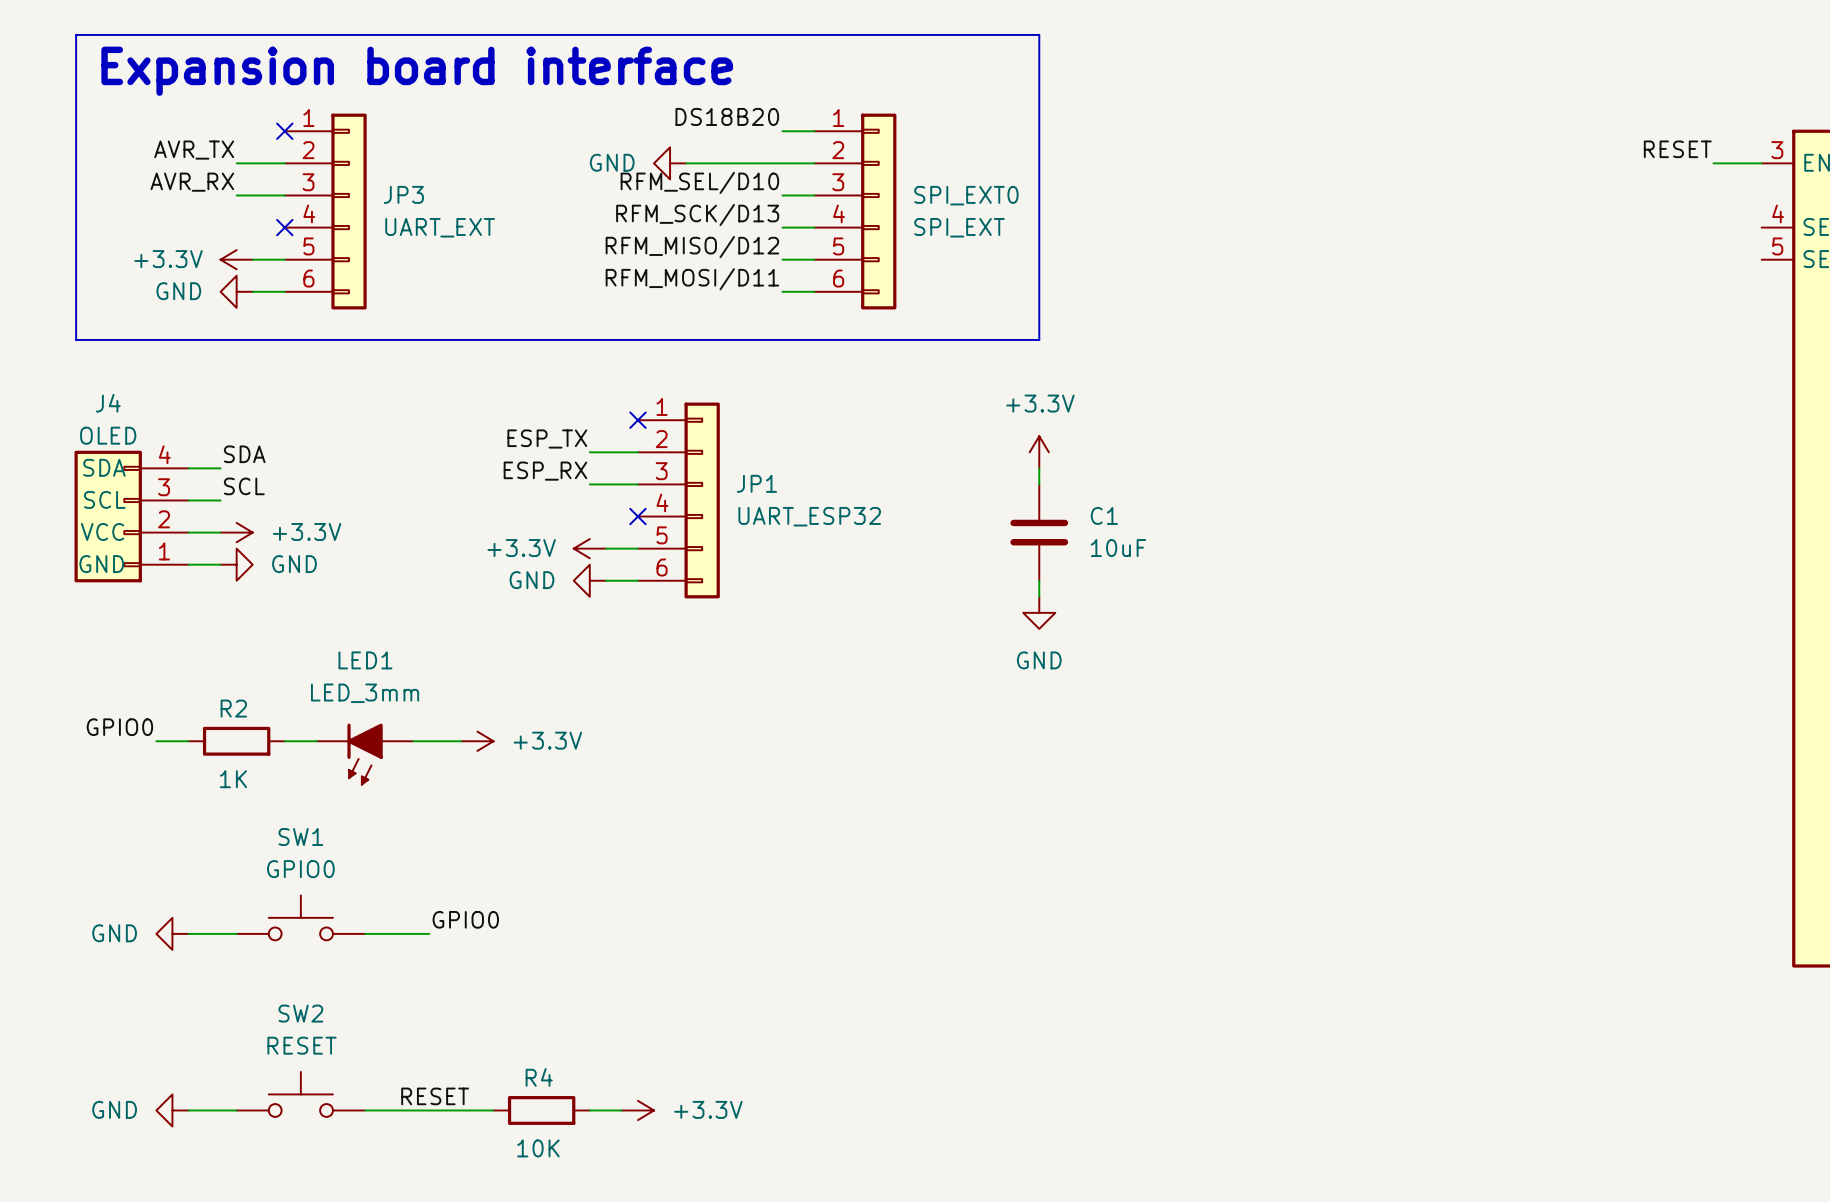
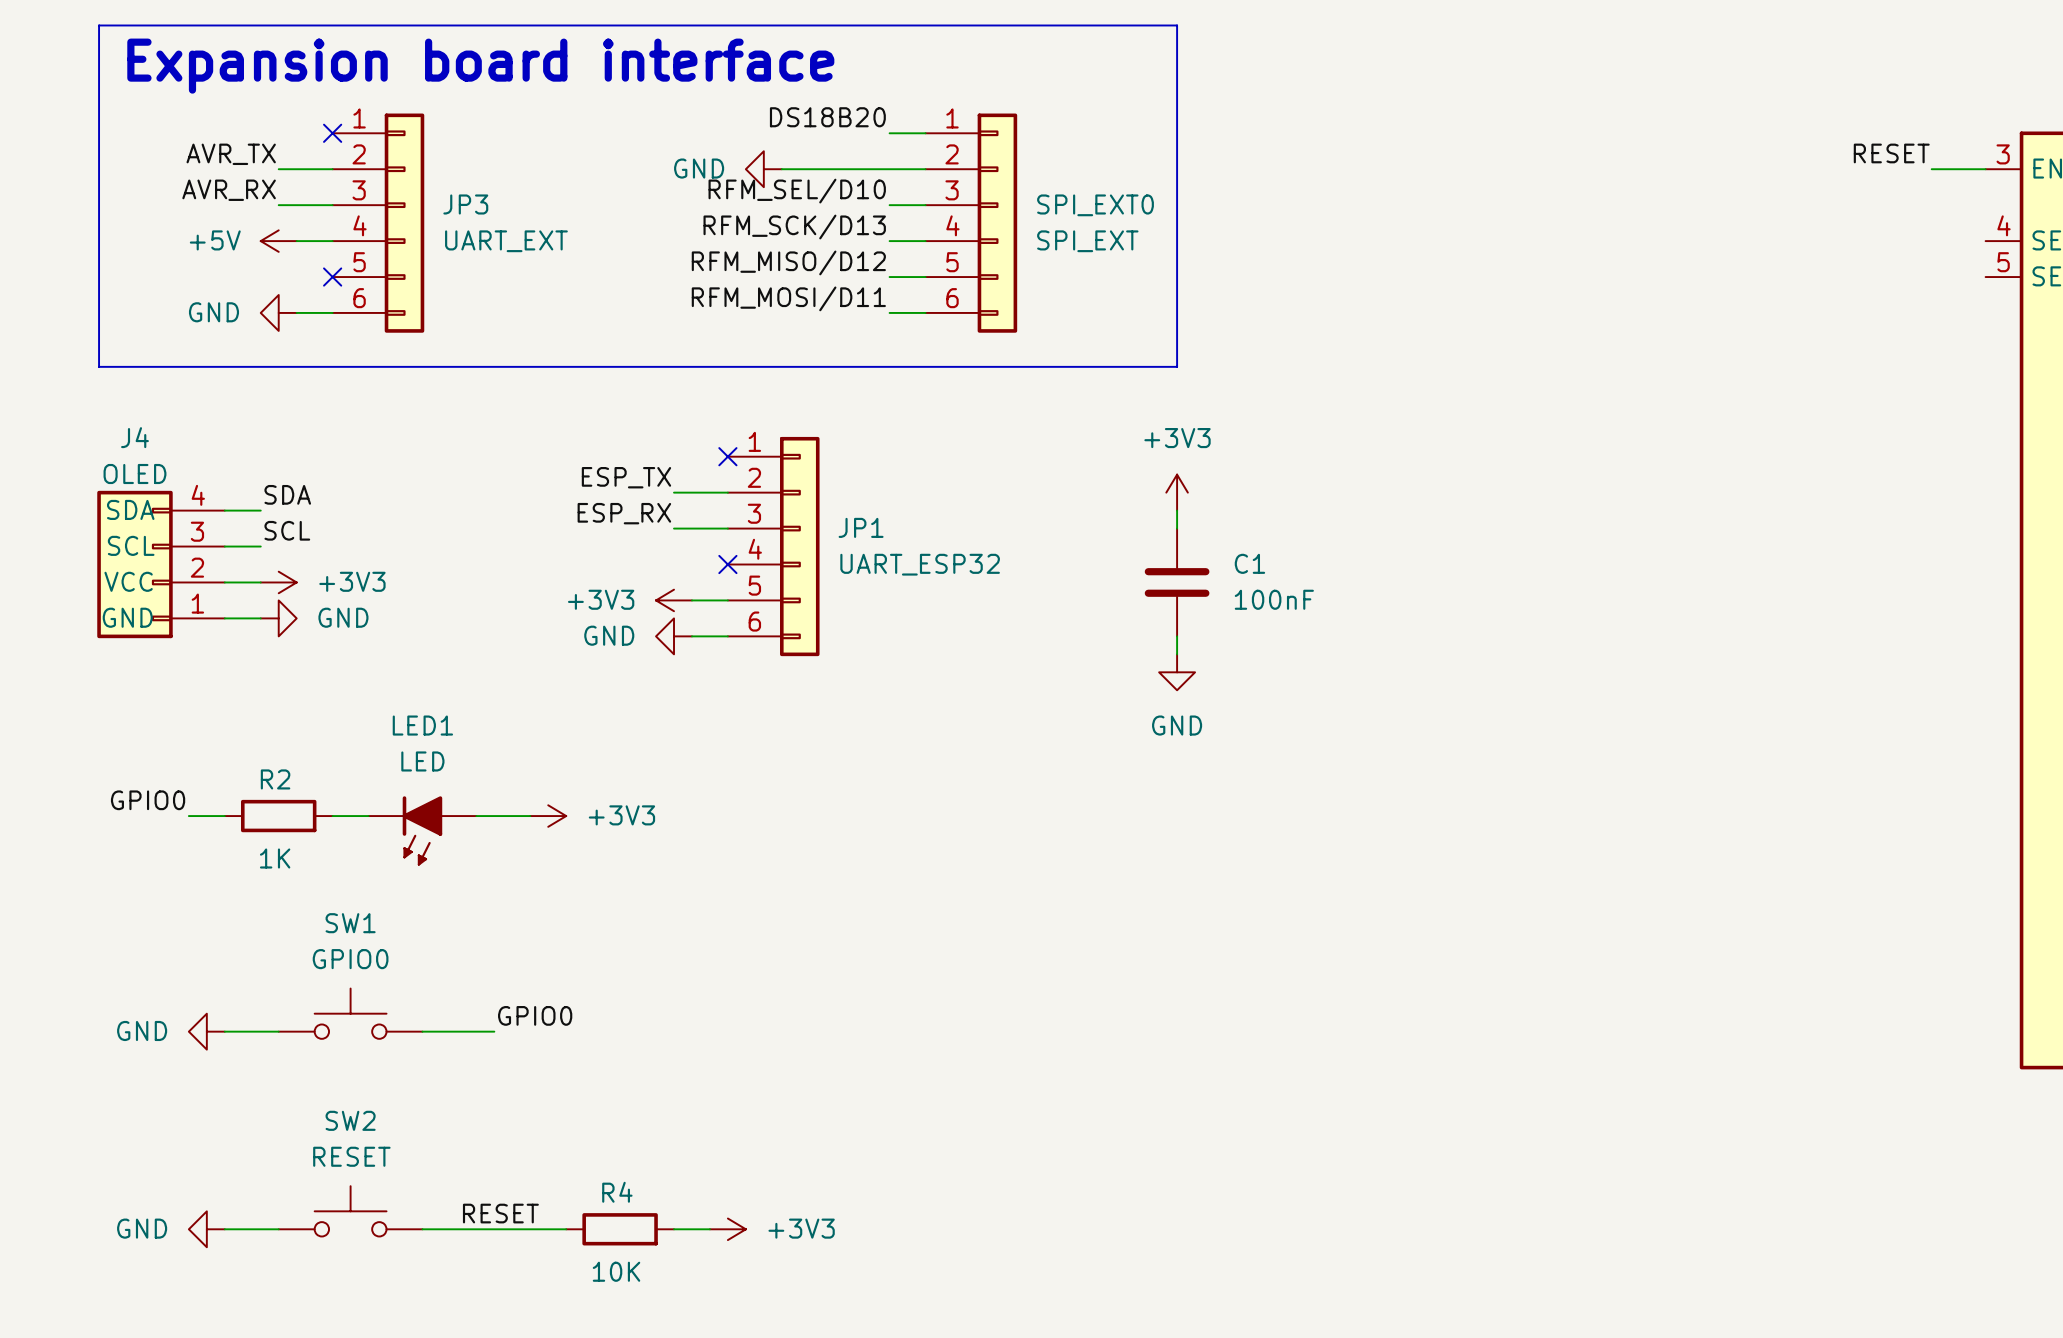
power symbol: none -> +5V (278, 241)
no-connect mark position: (284, 227) -> (332, 277)
power symbol: +3.3V (236, 259) -> none
wire: (252, 259) (284, 259) -> (296, 241) (332, 241)
power symbol: +3.3V (1039, 452) -> +3V3 (1177, 492)
power symbol: +3.3V (236, 532) -> +3V3 (278, 582)
power symbol: +3.3V (589, 548) -> +3V3 (674, 600)
C1 value: 10uF (1118, 548) -> 100nF (1274, 599)
LED1 value: LED_3mm (365, 693) -> LED (422, 761)
power symbol: +3.3V (477, 741) -> +3V3 (548, 816)
power symbol: +3.3V (637, 1110) -> +3V3 (727, 1229)

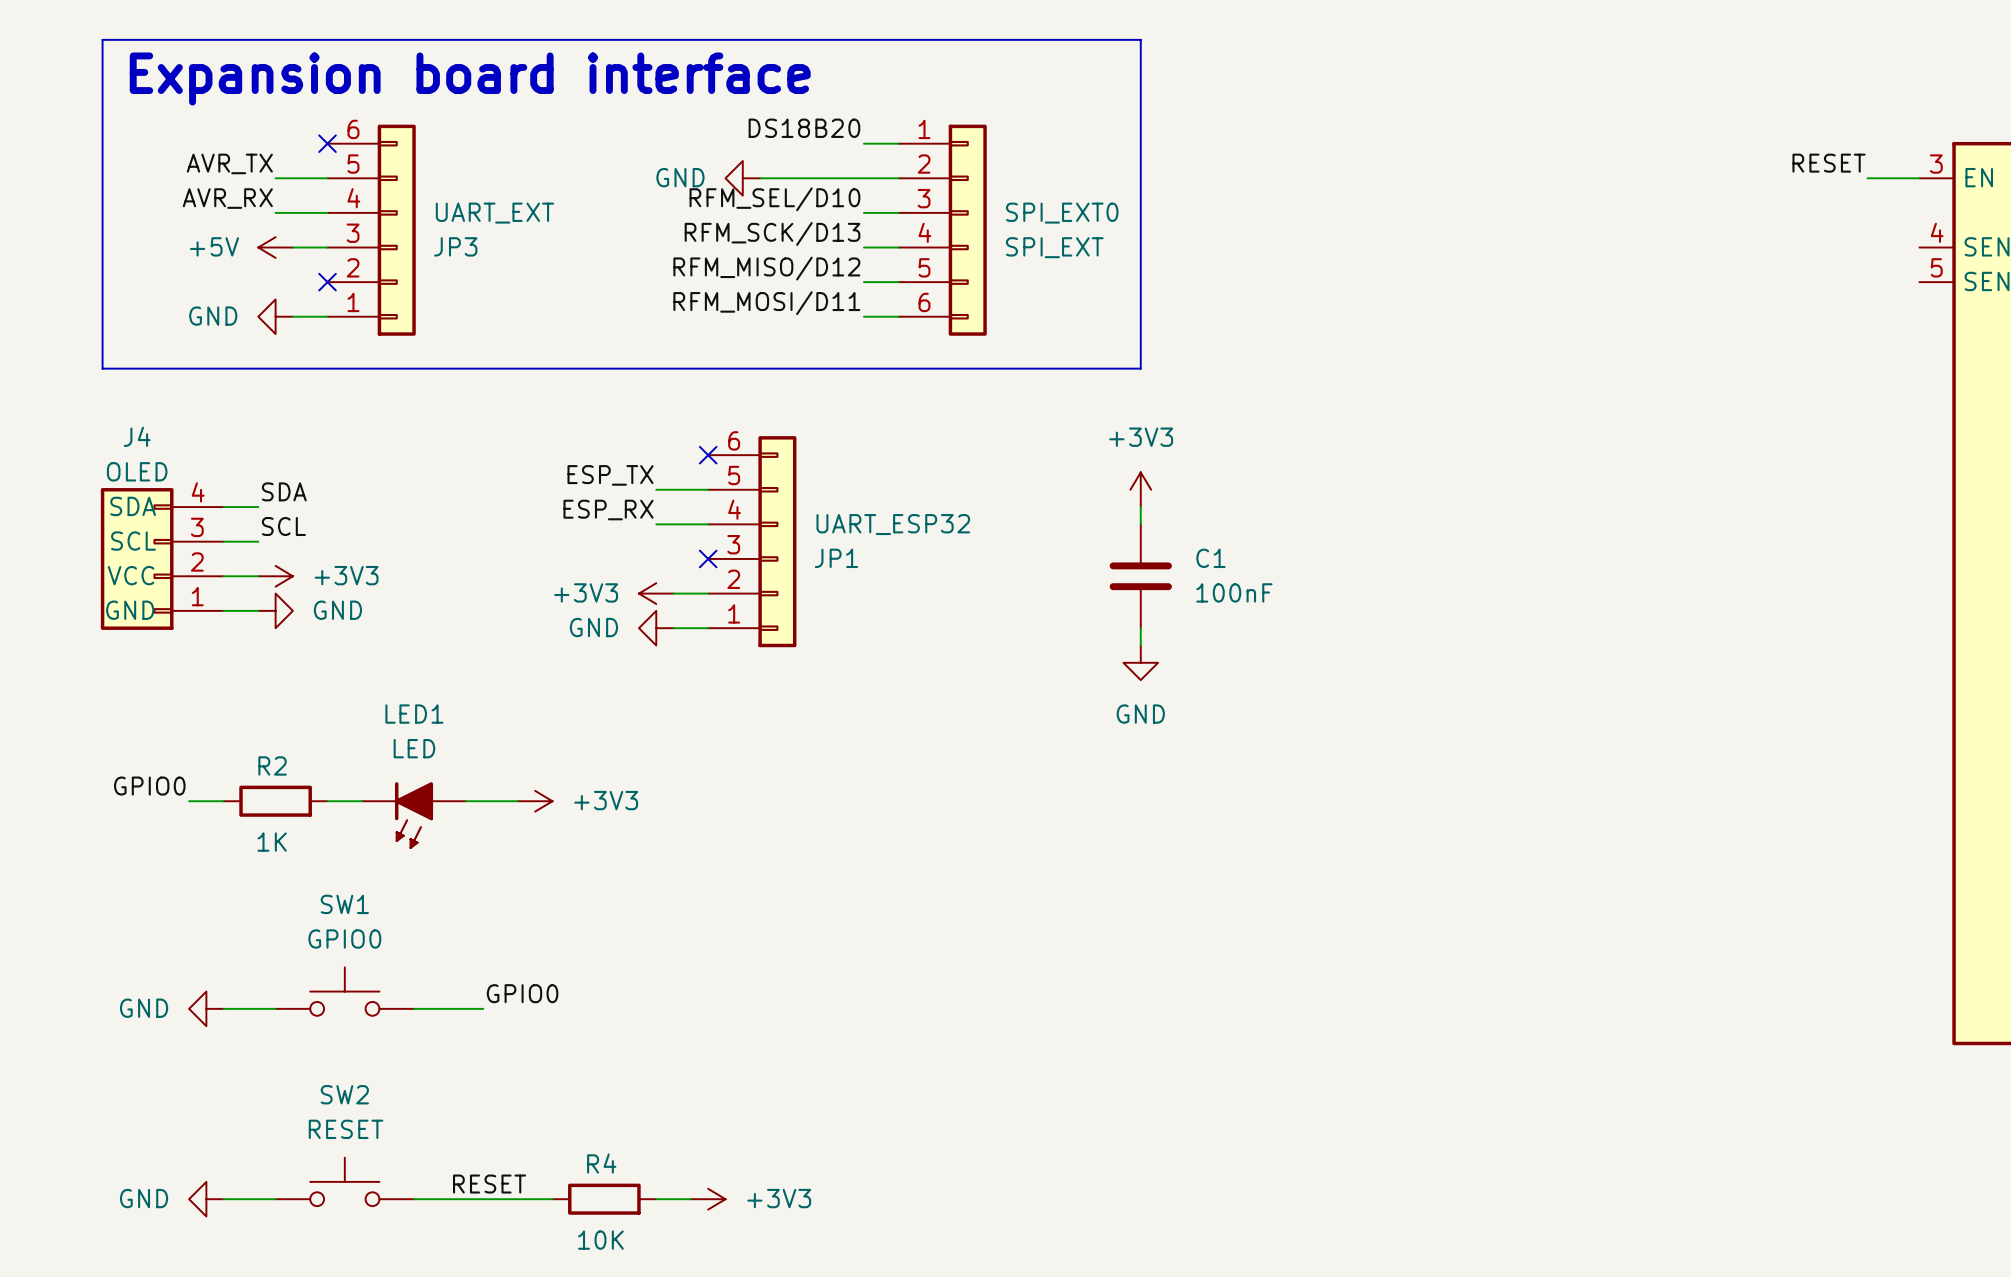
JP3 flip: as is (404, 223) -> up-down (396, 230)
JP1 flip: as is (799, 546) -> up-down (777, 541)

